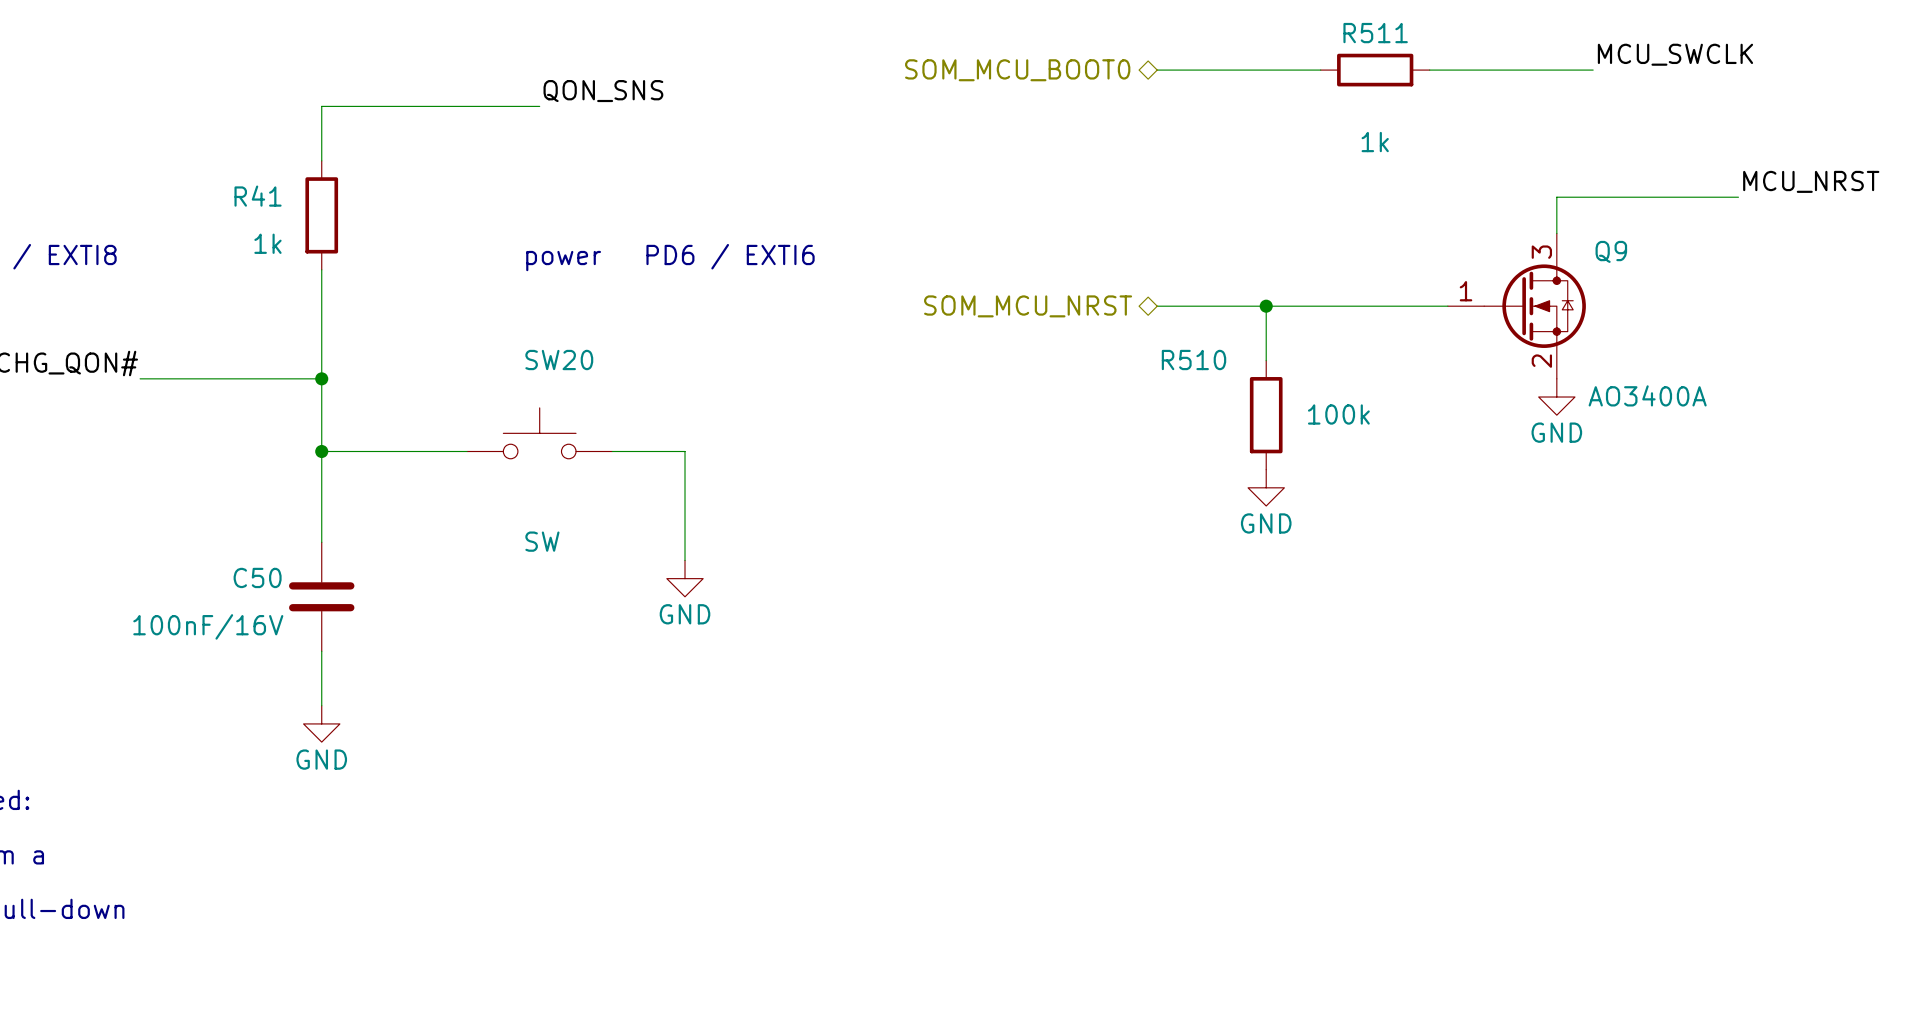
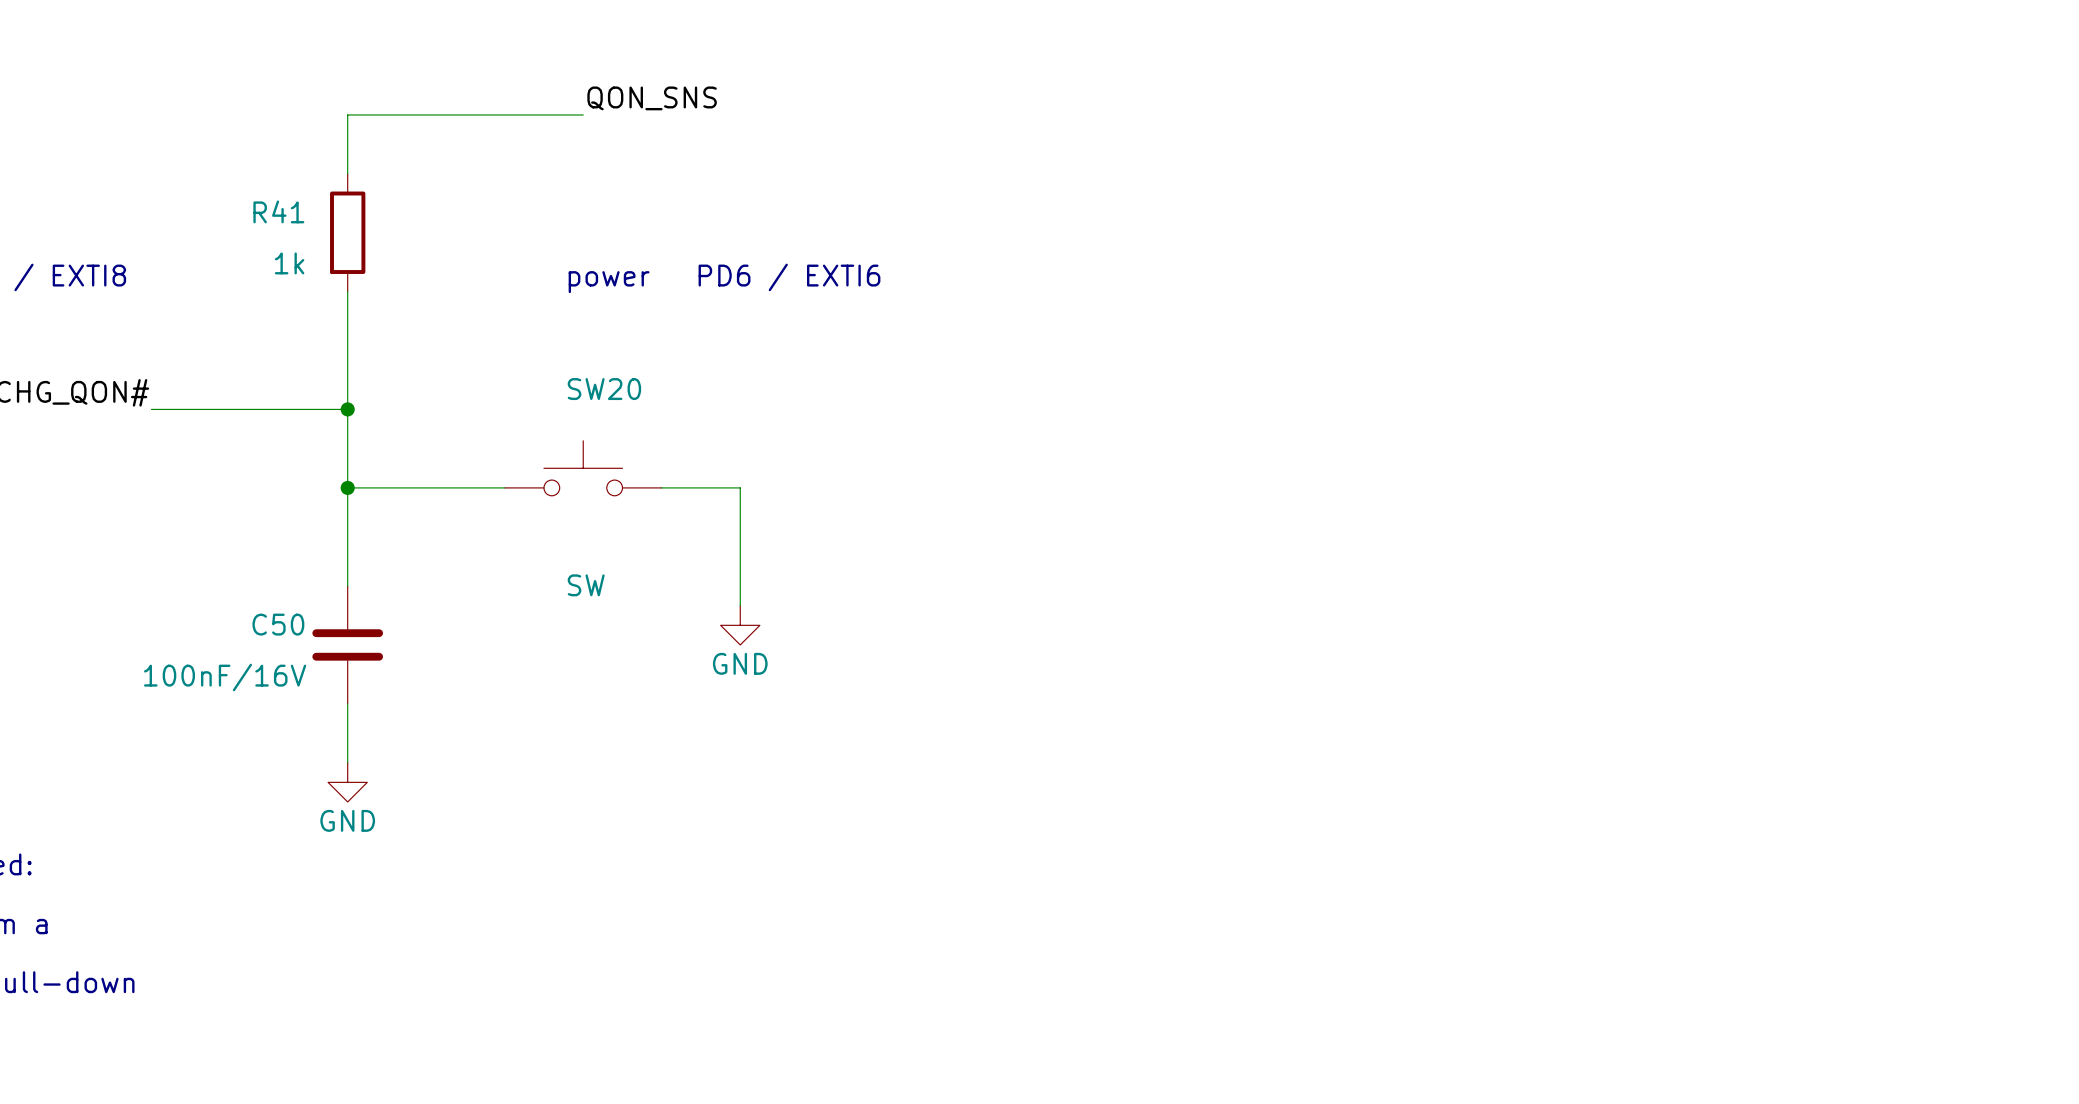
label: MCU_SWCLK (1675, 54) -> none
hierarchical label: SOM_MCU_BOOT0 (1017, 70) -> none
wire: (1157, 70) (1320, 70) -> none
R511: 1k (1375, 70) -> none
wire: (1429, 70) (1593, 70) -> none
label: MCU_NRST (1811, 181) -> none
wire: (1738, 197) (1556, 197) (1556, 233) -> none
hierarchical label: SOM_MCU_NRST (1028, 306) -> none
wire: (1157, 306) (1447, 306) -> none
wire: (1266, 306) (1266, 360) -> none
junction: (1266, 306) -> none
Q9: AO3400A (1516, 306) -> none
power symbol: GND (1556, 397) -> none
R510: 100k (1266, 415) -> none
power symbol: GND (1266, 487) -> none

